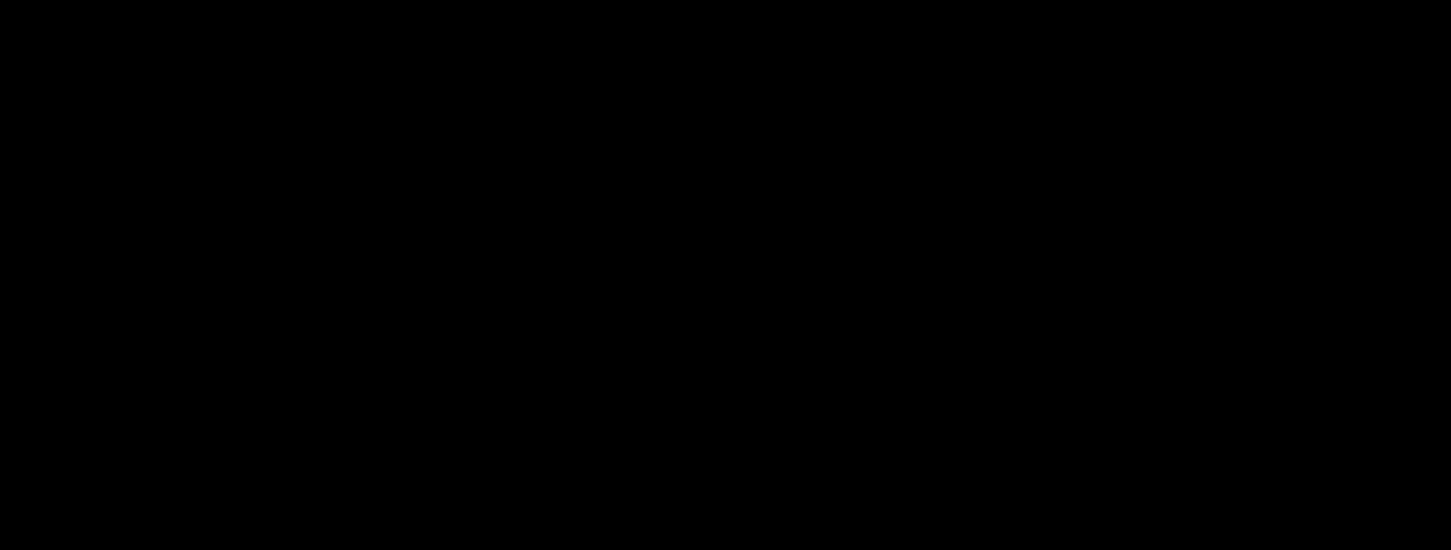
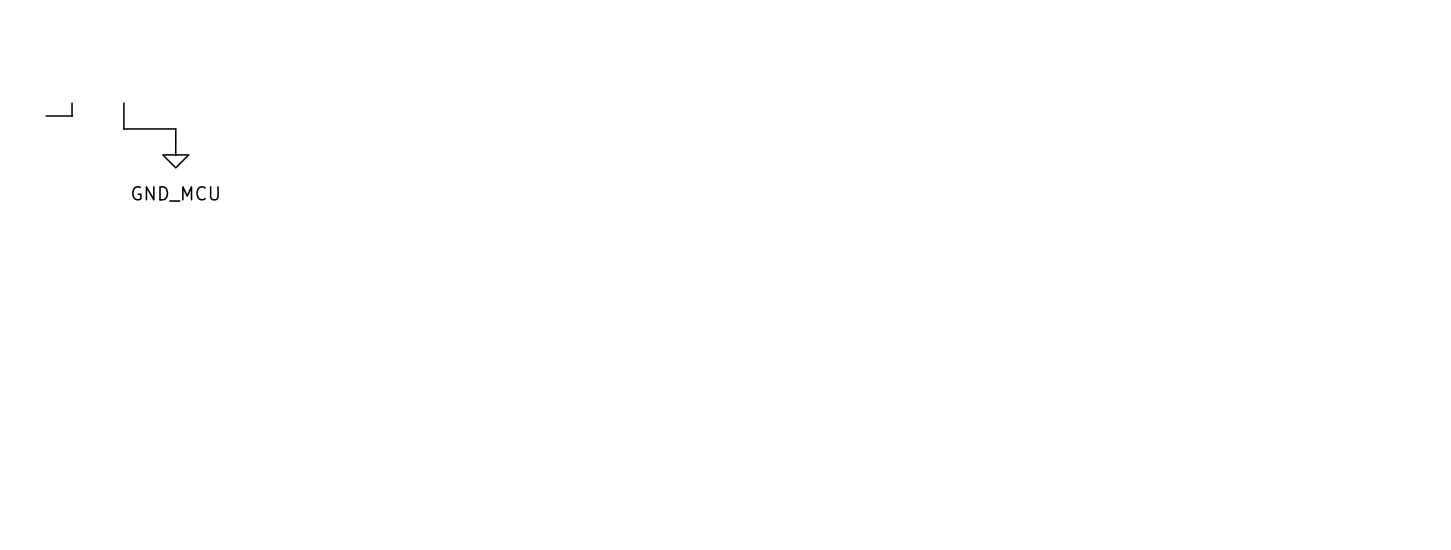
wire: none -> (72, 103) (72, 115) (46, 115)
wire: none -> (123, 103) (123, 128) (175, 128) (175, 141)
power symbol: none -> GND_MCU (175, 154)

